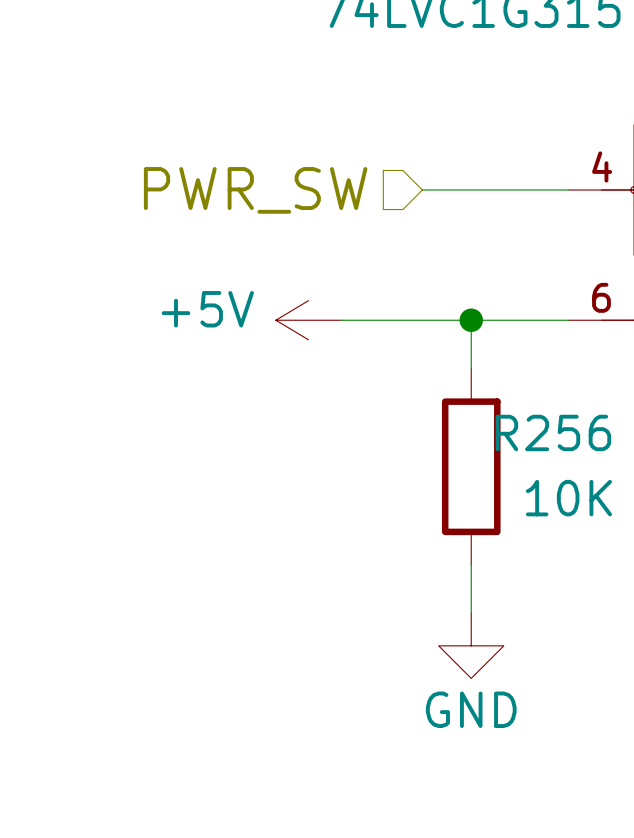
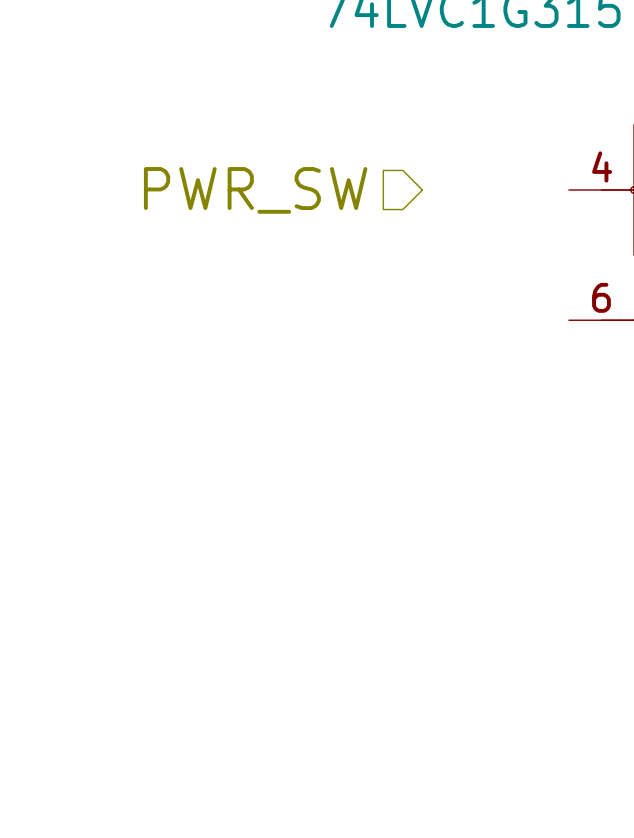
wire: (422, 190) (568, 190) -> none
power symbol: +5V (308, 320) -> none
wire: (341, 320) (568, 320) -> none
wire: (471, 320) (471, 369) -> none
junction: (471, 320) -> none
R256: 10K (471, 466) -> none
wire: (471, 564) (471, 613) -> none
power symbol: GND (471, 645) -> none

